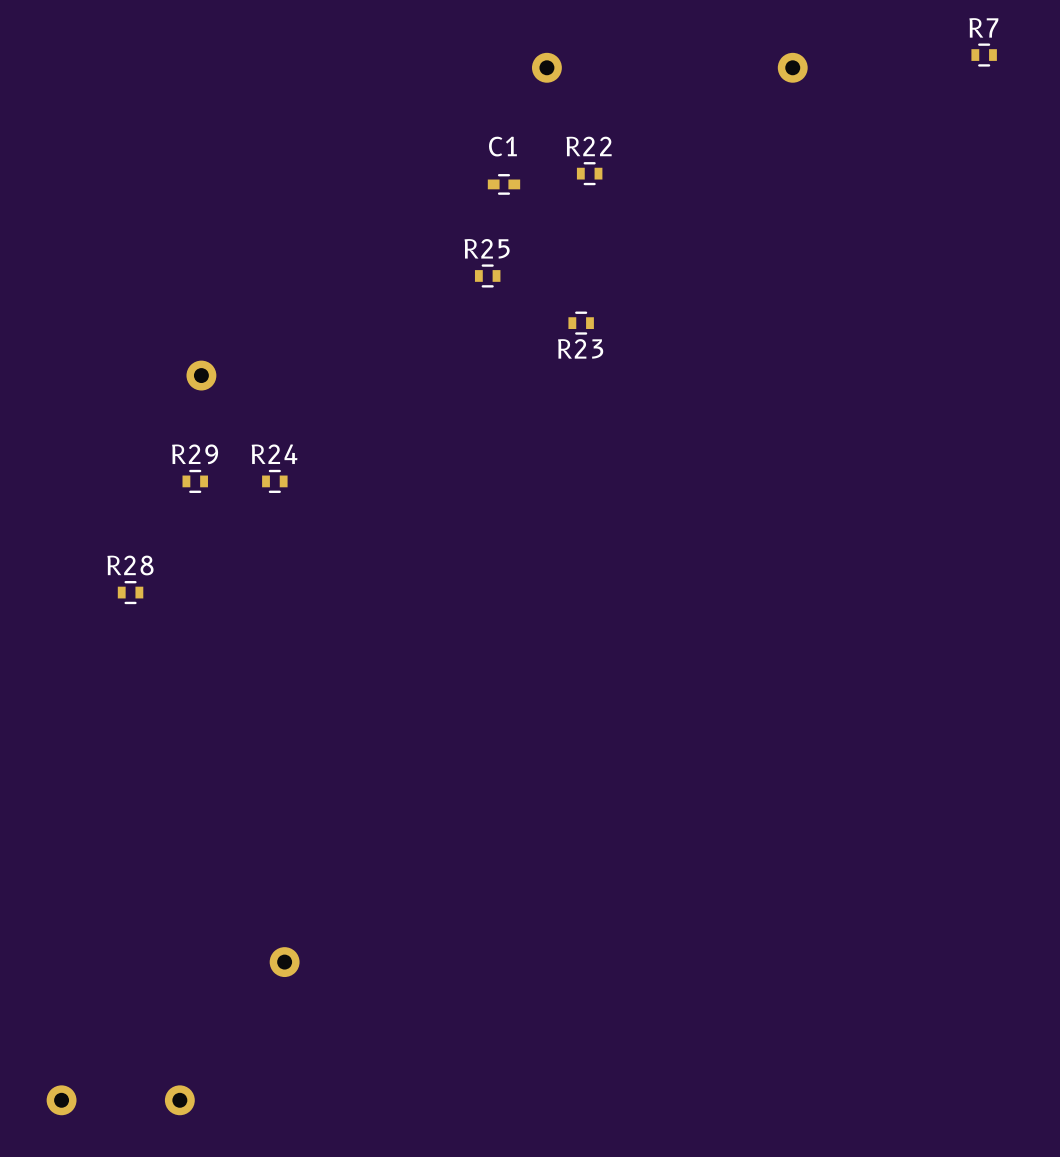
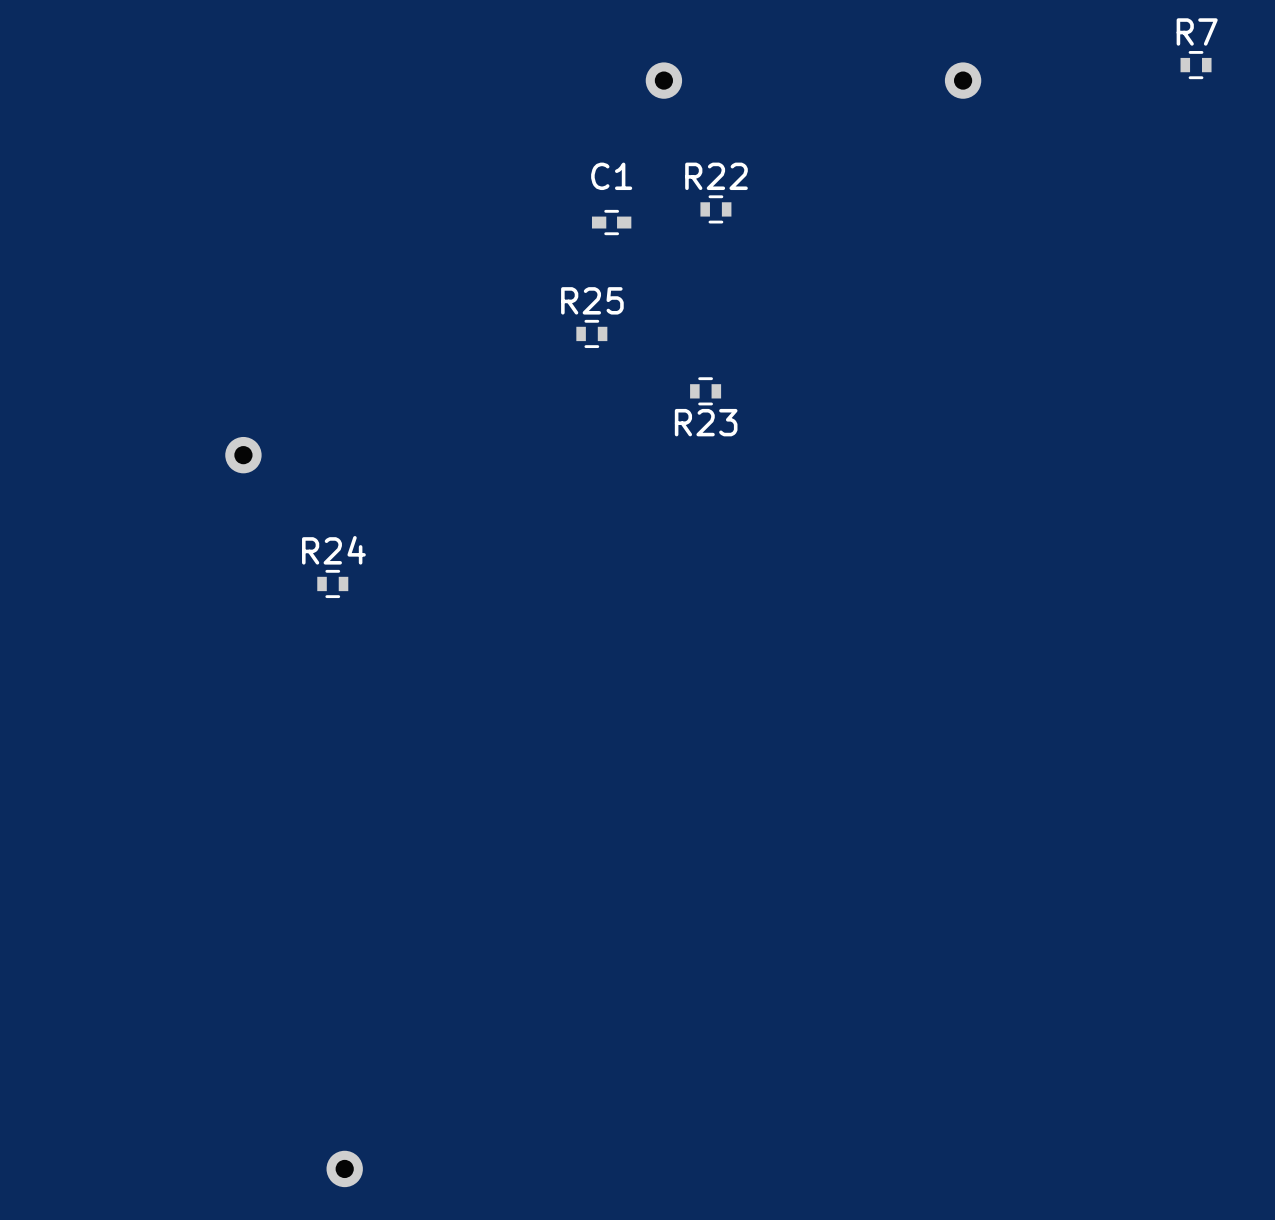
R29: (195, 481) -> none
R28: (130, 592) -> none

